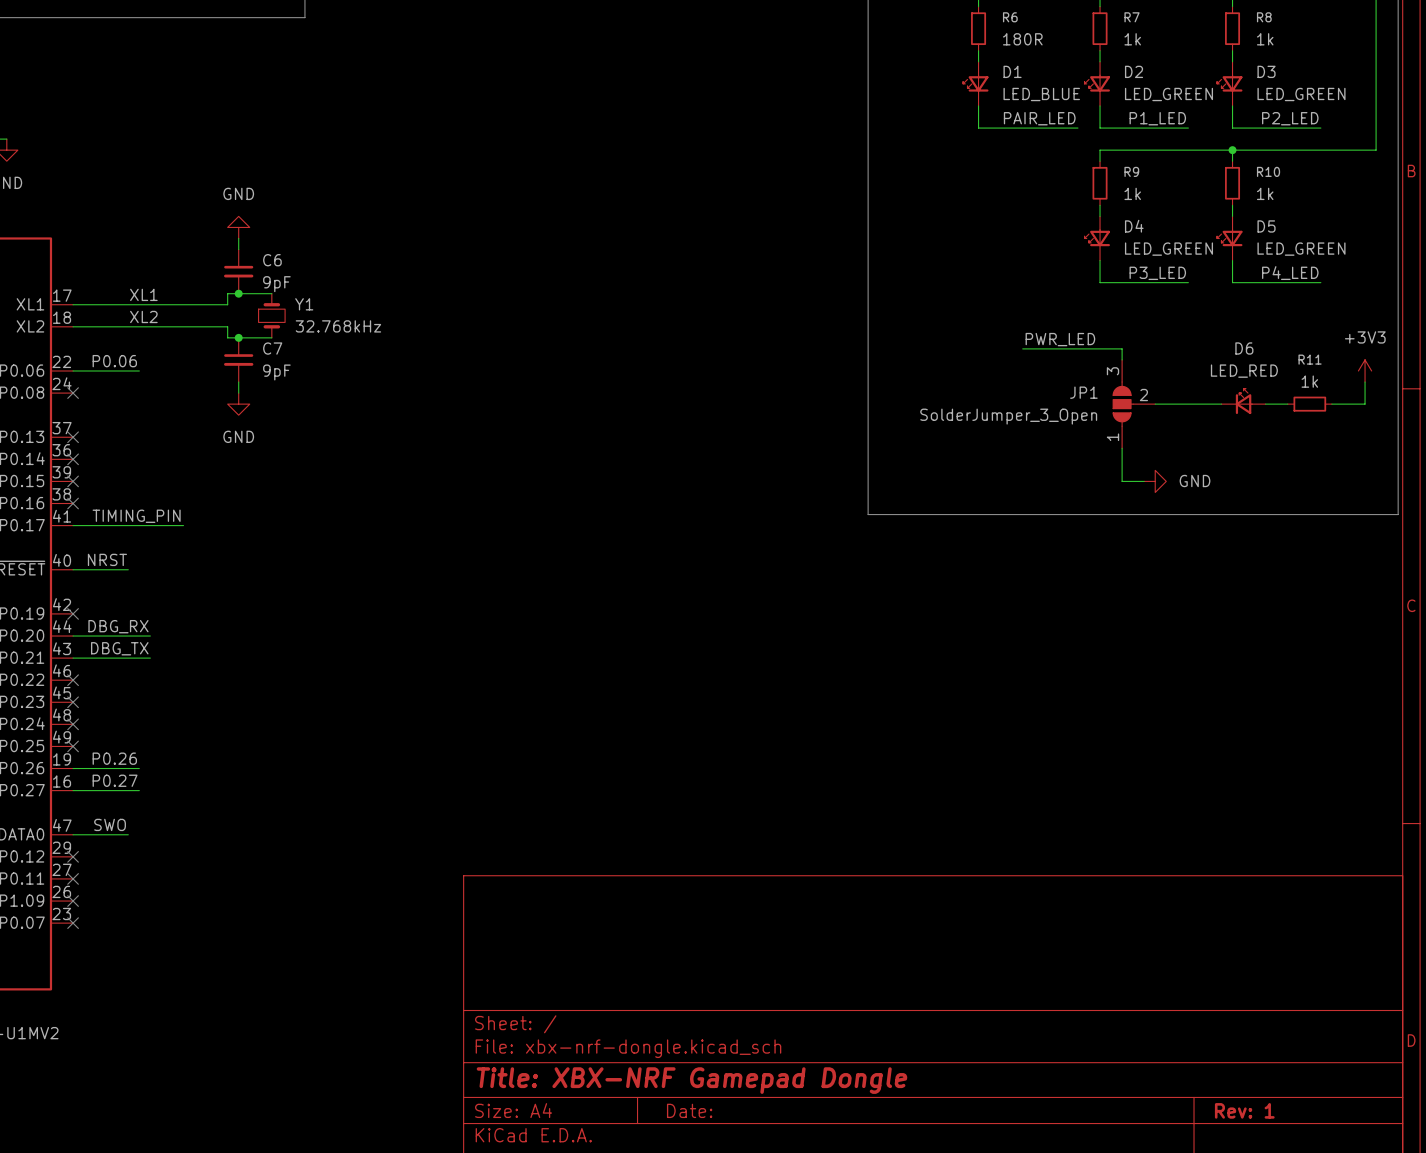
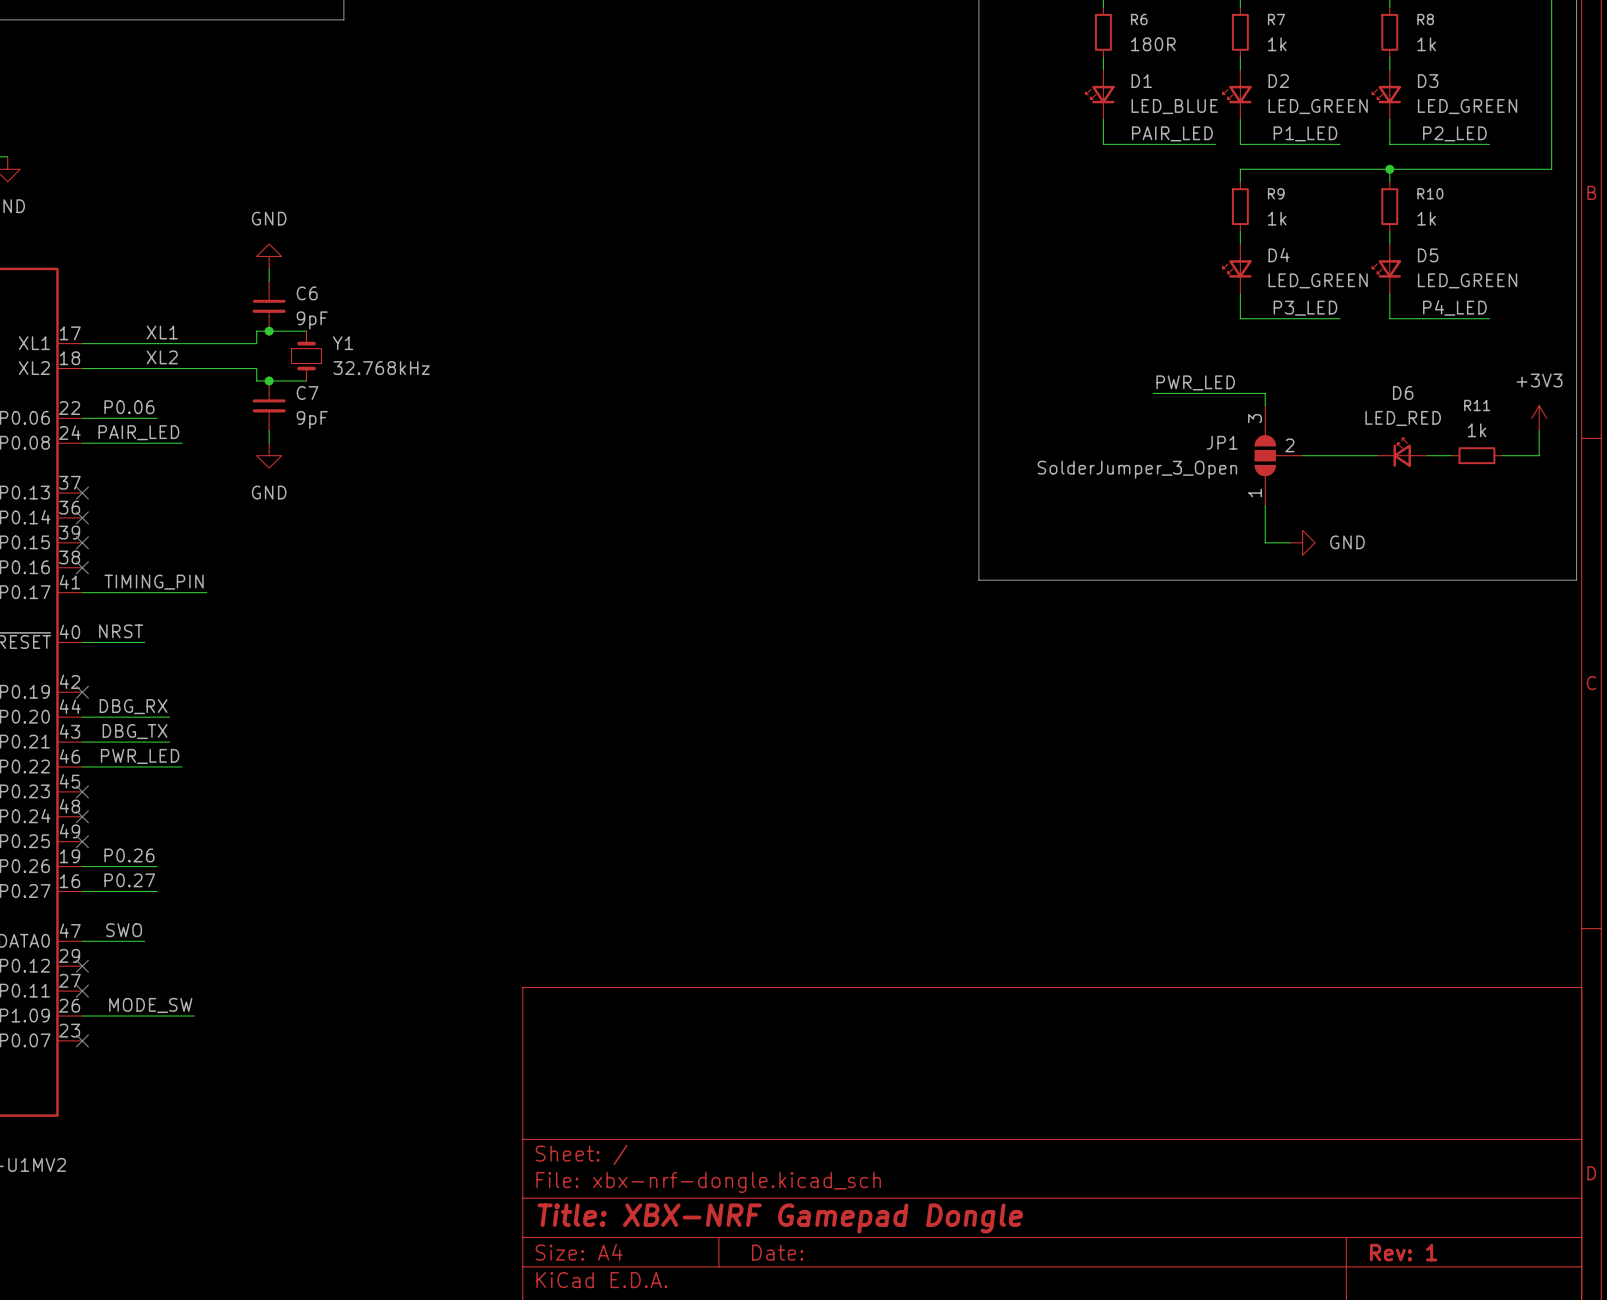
label: none -> PAIR_LED (138, 432)
wire: none -> (82, 443) (182, 443)
no-connect mark: (73, 393) -> none
label: none -> PWR_LED (140, 756)
wire: none -> (82, 766) (182, 766)
no-connect mark: (73, 680) -> none
label: none -> MODE_SW (150, 1005)
wire: none -> (82, 1016) (194, 1016)
no-connect mark: (73, 901) -> none

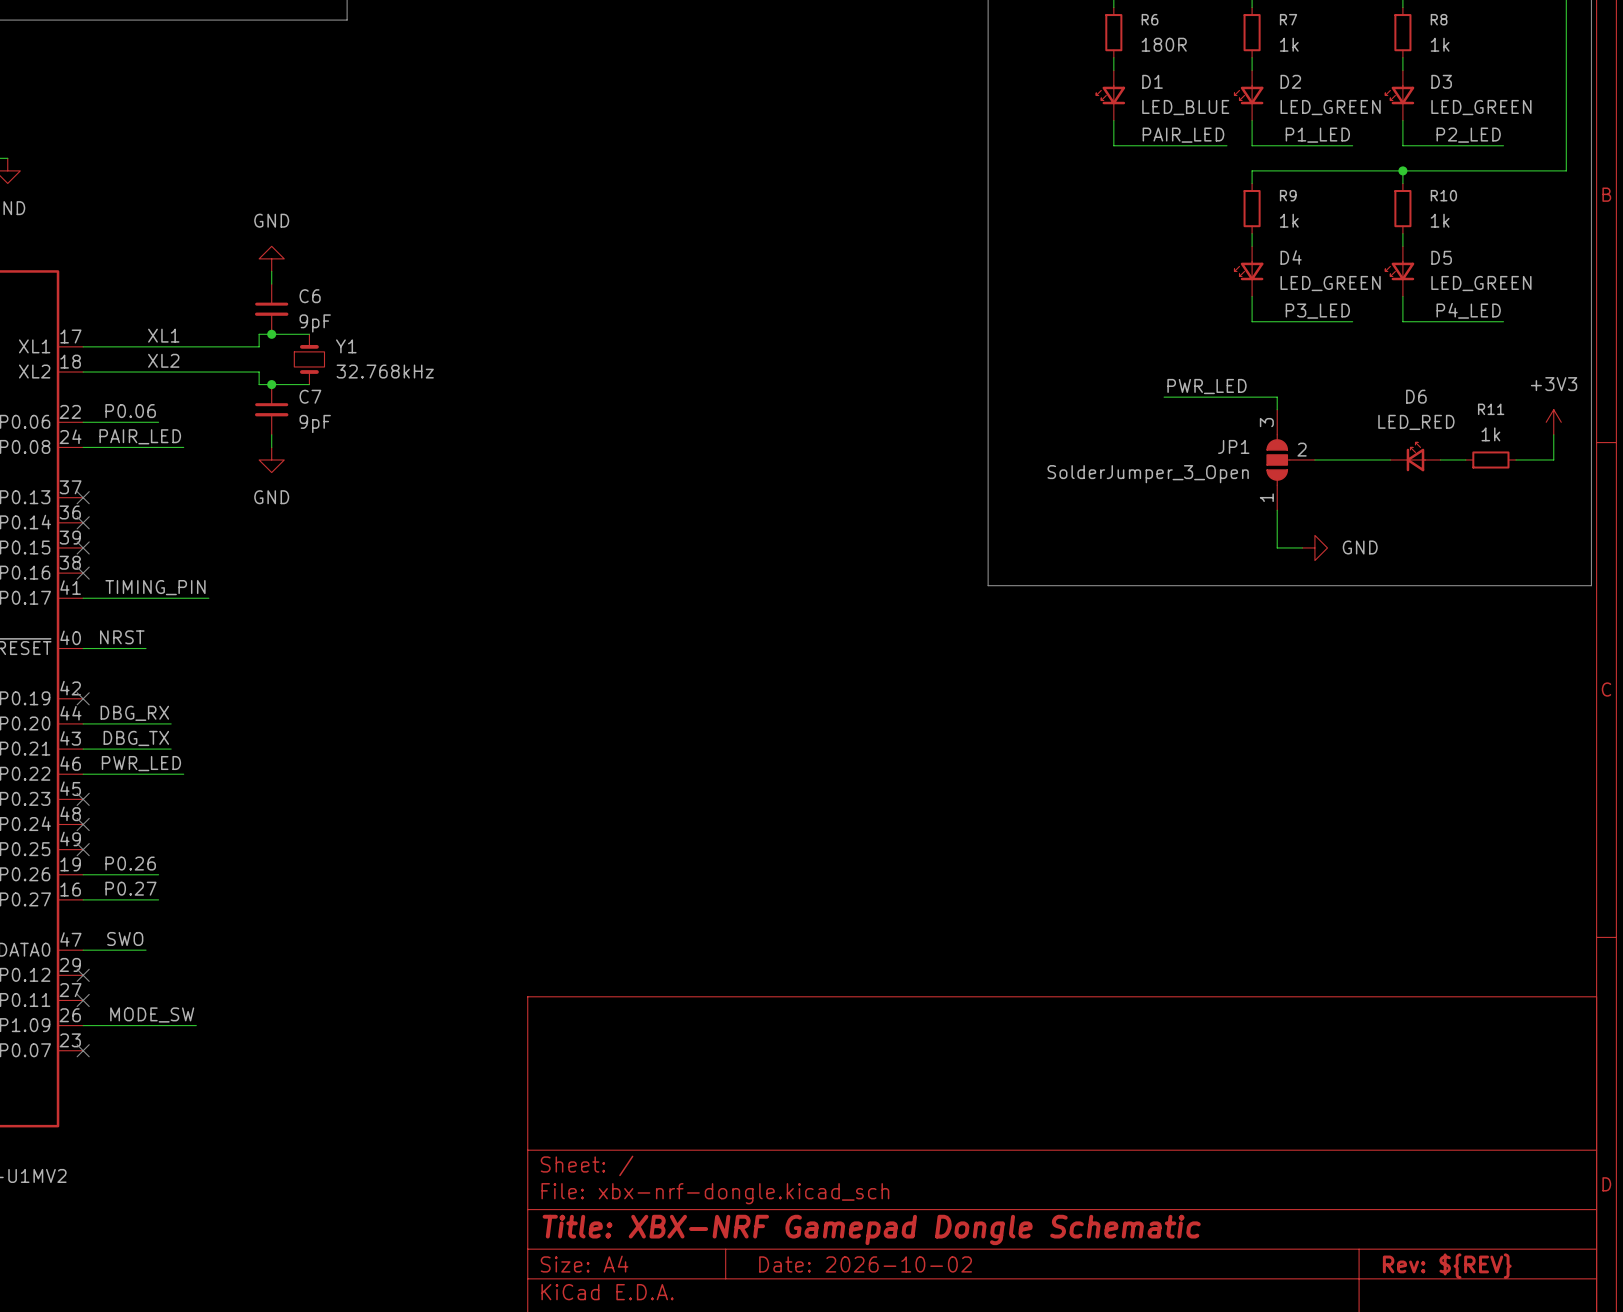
title block: Title: XBX-NRF Gamepad Dongle (780, 1218) -> Title: XBX-NRF Gamepad Dongle Schematic (871, 1229)
title block: Date: (777, 1252) -> Date: 2026-10-02 (865, 1264)
title block: Rev: 1 (1403, 1252) -> Rev: ${REV} (1447, 1266)

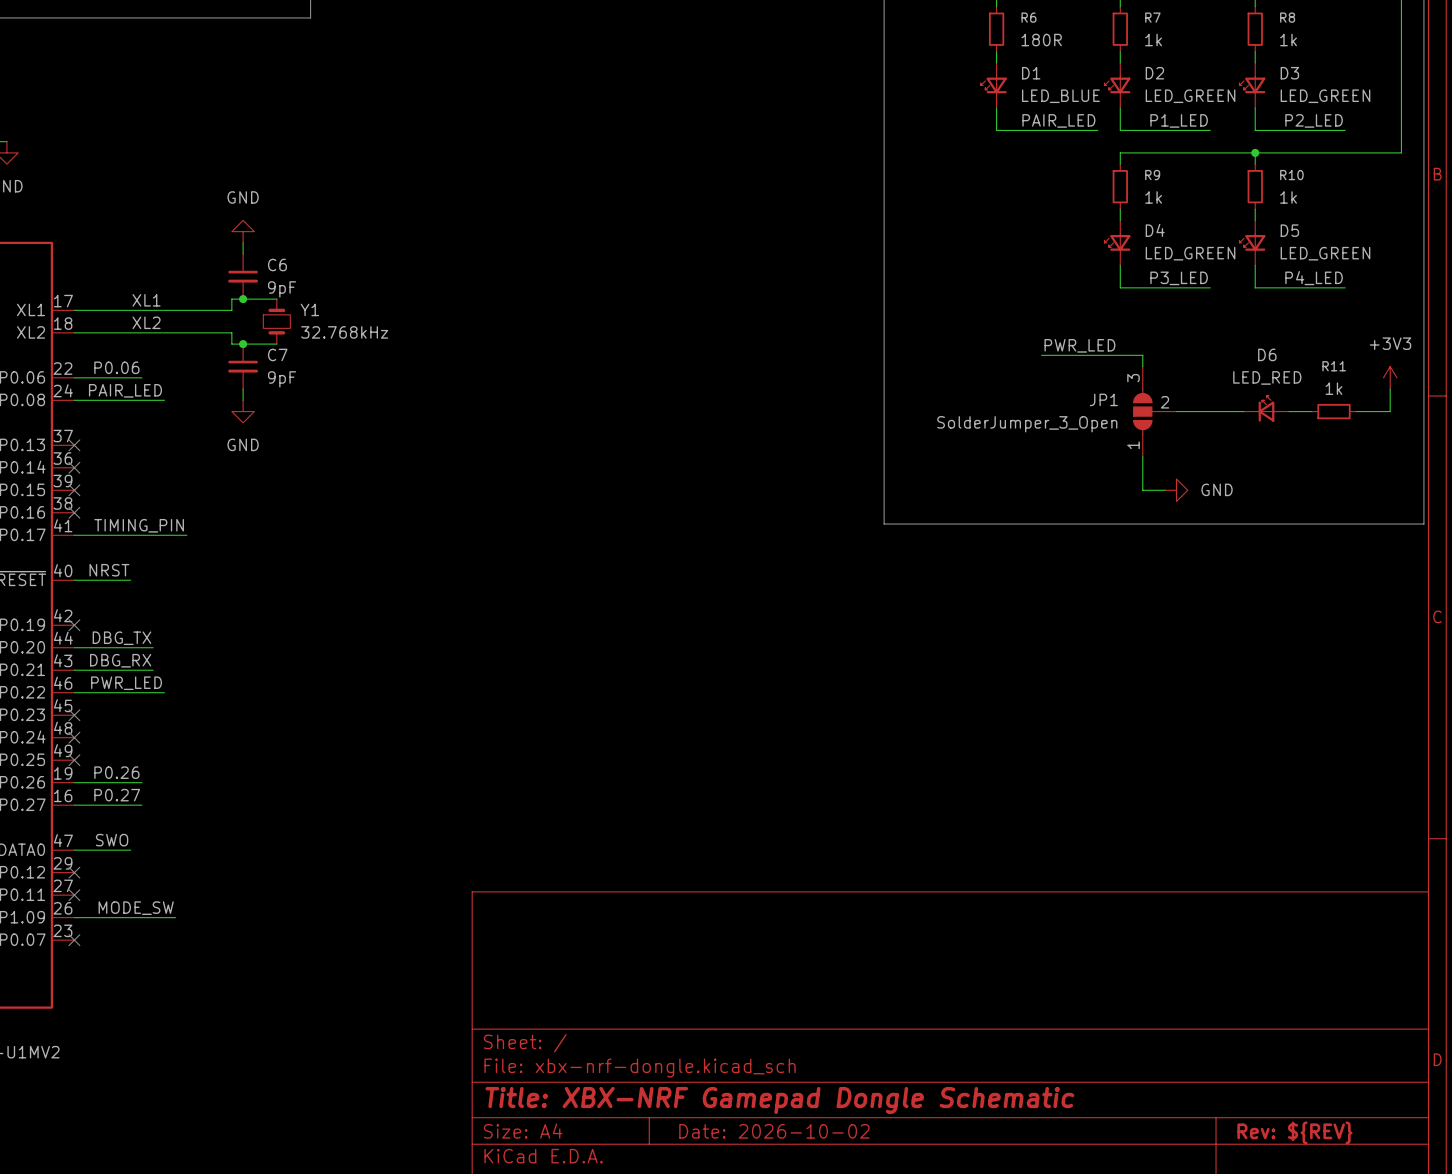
label: DBG_RX (134, 713) -> DBG_TX (121, 638)
label: DBG_TX (136, 738) -> DBG_RX (120, 660)

